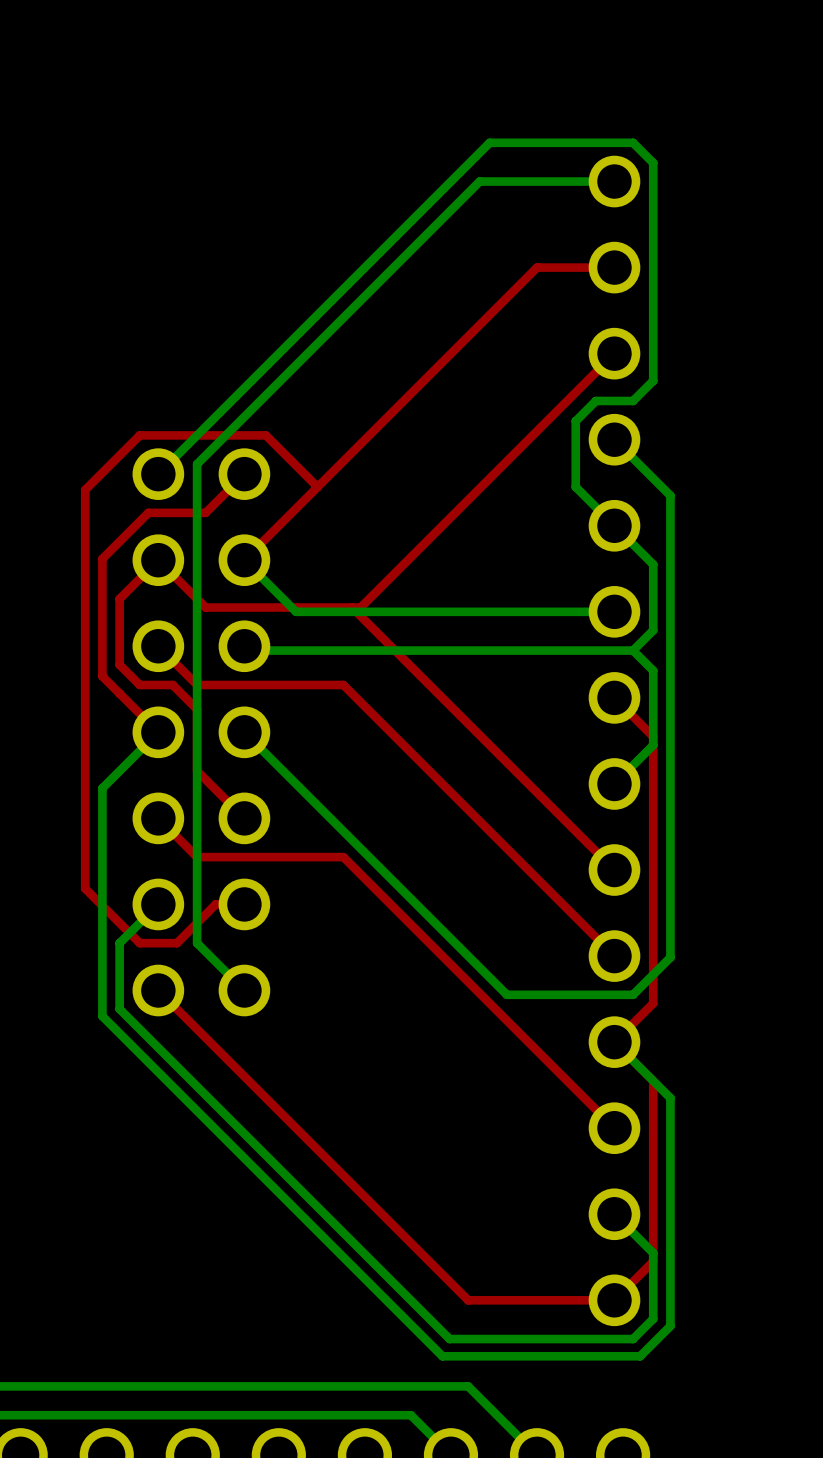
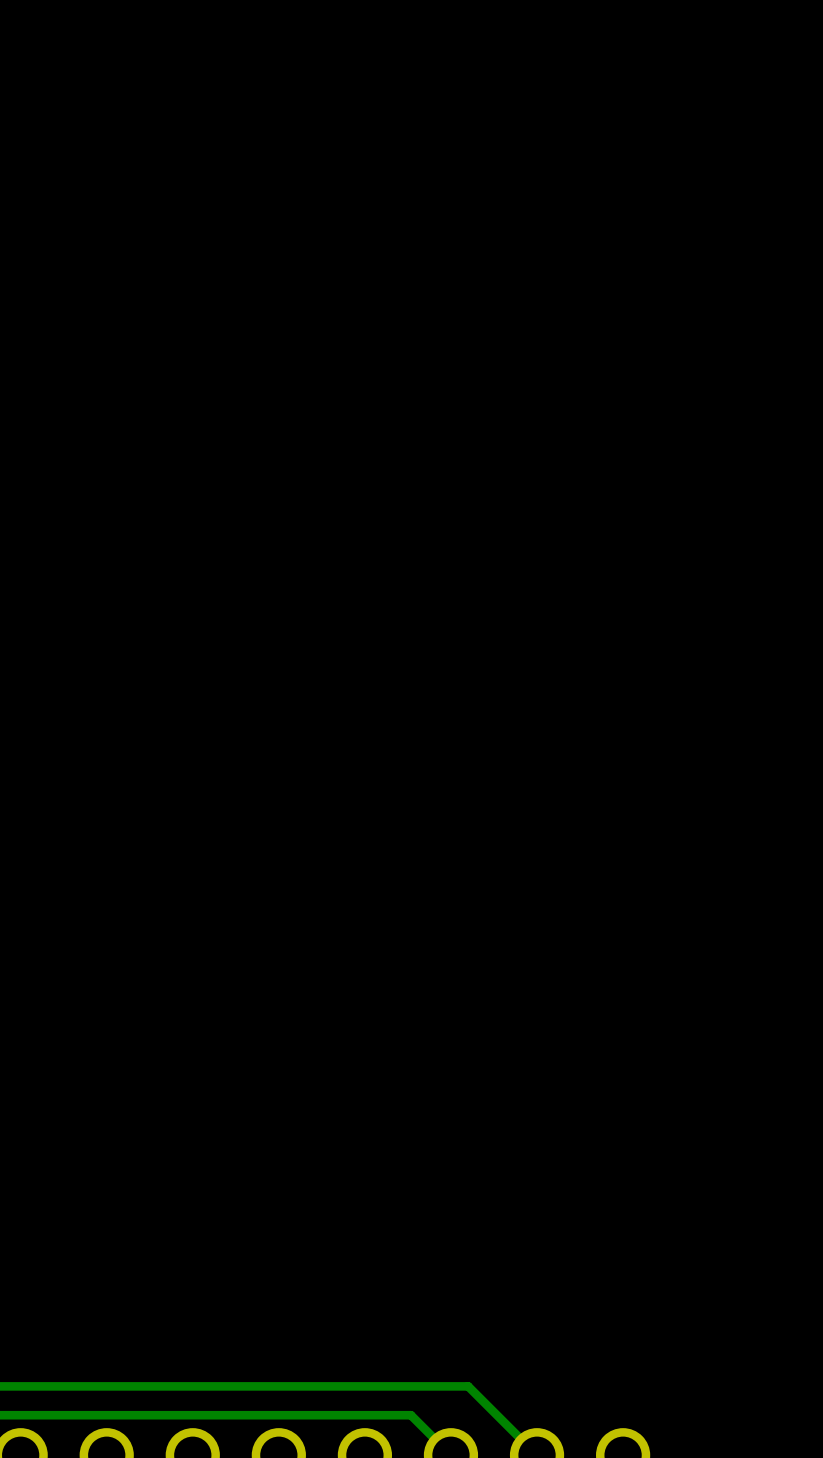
bottom track: (614, 181) (479, 181) (197, 464) (197, 943) (244, 990) -> none
top track: (614, 267) (537, 267) (244, 560) -> none
top track: (614, 353) (360, 607) (205, 607) (158, 560) (119, 598) (119, 664) (139, 684) (172, 684) (197, 709) (197, 771) (244, 818) -> none
bottom track: (614, 439) (670, 495) (670, 957) (633, 994) (506, 994) (244, 732) -> none
bottom track: (158, 474) (489, 142) (633, 142) (653, 162) (653, 380) (633, 400) (595, 400) (575, 421) (575, 487) (653, 564) (653, 630) (633, 650) -> none
top track: (244, 474) (205, 512) (148, 512) (102, 558) (102, 676) (158, 732) -> none
top track: (317, 487) (265, 435) (139, 435) (85, 489) (85, 888) (139, 943) (176, 943) (215, 904) (244, 904) -> none
bottom track: (244, 560) (296, 611) (614, 611) -> none
top track: (352, 607) (614, 870) -> none
top track: (158, 646) (197, 684) (343, 684) (614, 956) -> none
bottom track: (244, 646) (248, 650) (633, 650) -> none
bottom track: (633, 650) (653, 670) (653, 745) (614, 783) -> none
top track: (614, 697) (653, 736) (653, 1003) (614, 1042) (653, 1080) (653, 1261) (614, 1300) (468, 1300) (158, 990) -> none
bottom track: (158, 732) (102, 788) (102, 1016) (442, 1356) (640, 1356) (670, 1326) (670, 1098) (614, 1042) -> none
part: (201, 732) -> none
part: (614, 740) -> none
top track: (158, 818) (197, 857) (343, 857) (614, 1128) -> none
bottom track: (158, 904) (119, 943) (119, 1009) (449, 1339) (633, 1339) (653, 1318) (653, 1252) (614, 1214) -> none

